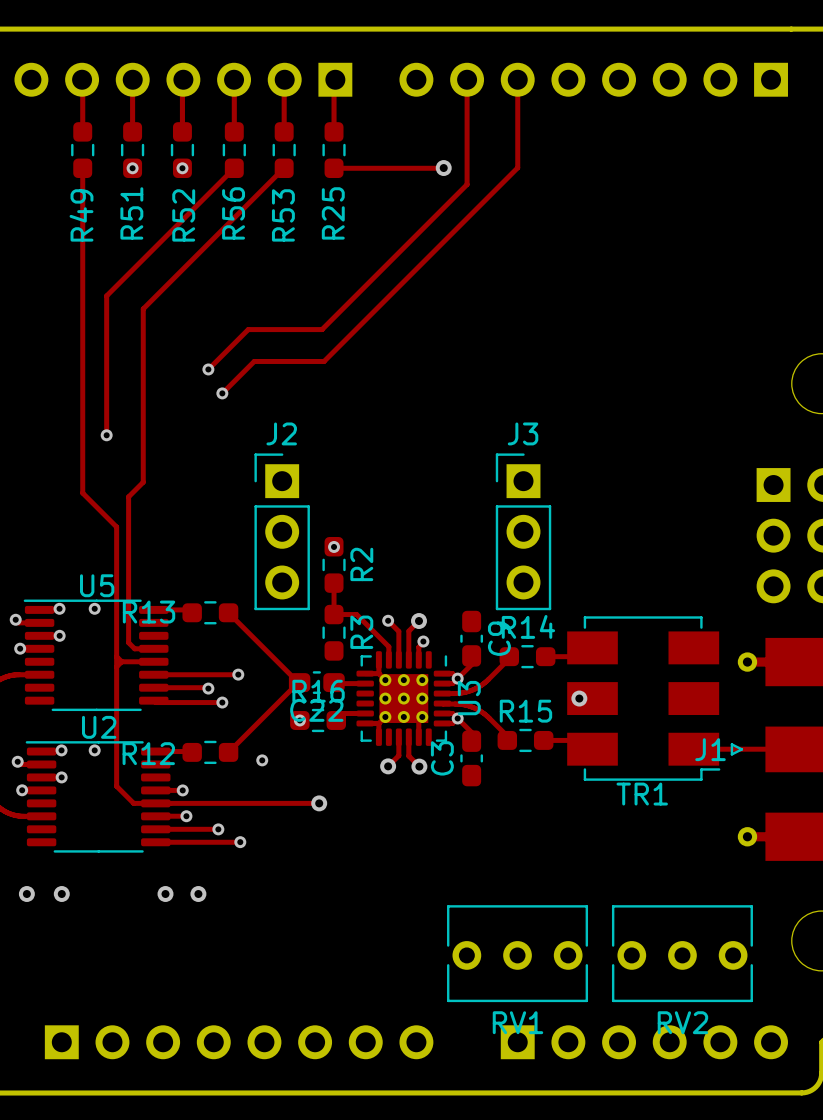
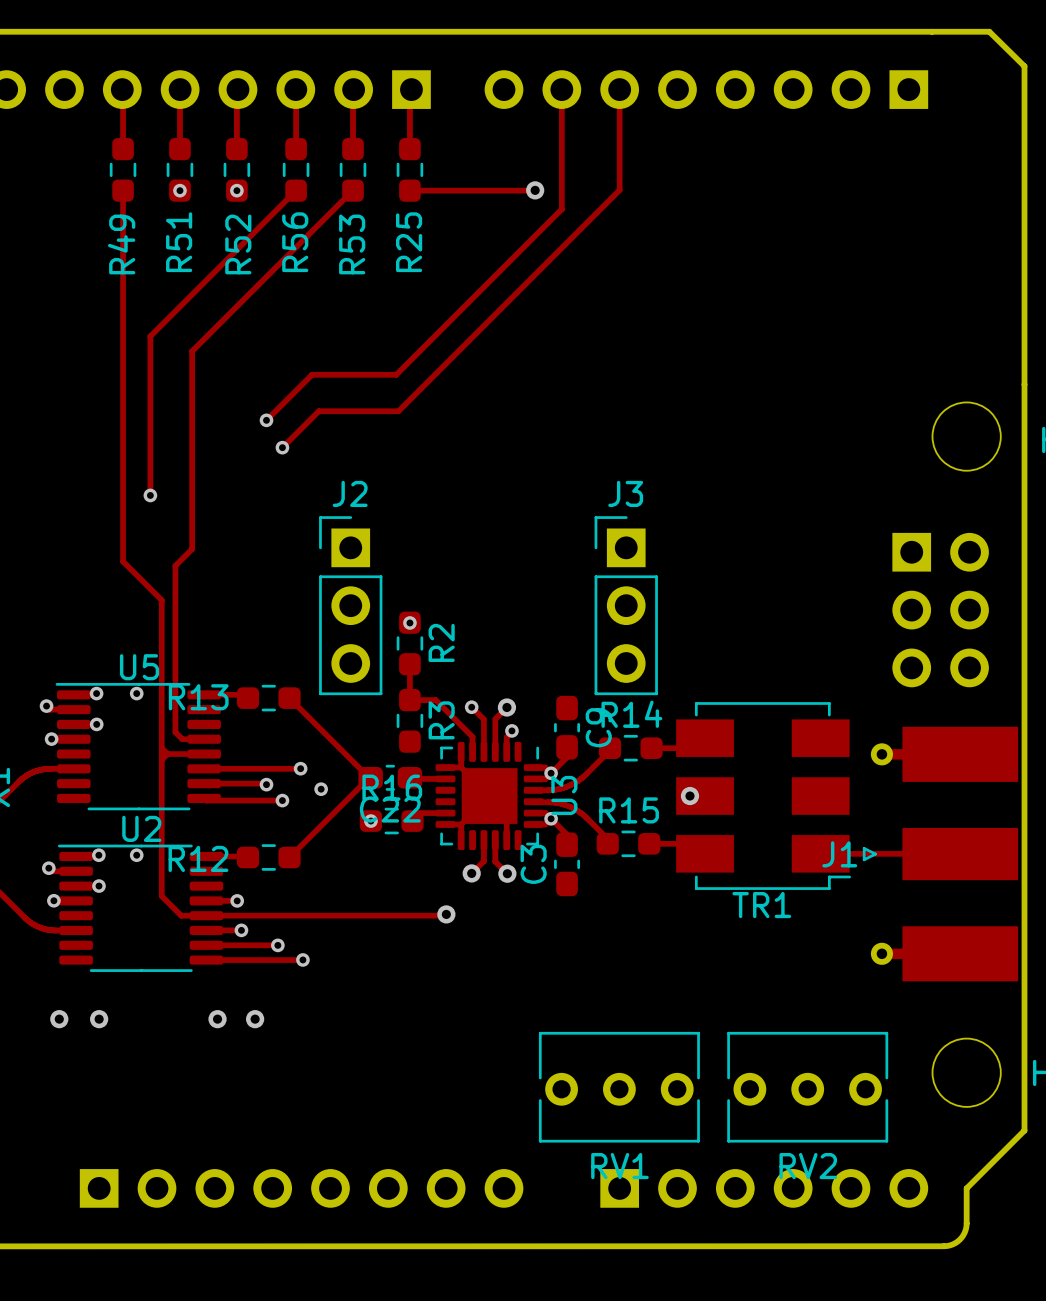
U3 footprint: [356, 651, 452, 746] -> [435, 741, 544, 851]
via position: (262, 760) -> (321, 789)
track: none -> (446, 914) (393, 915)
via position: (319, 803) -> (446, 914)

